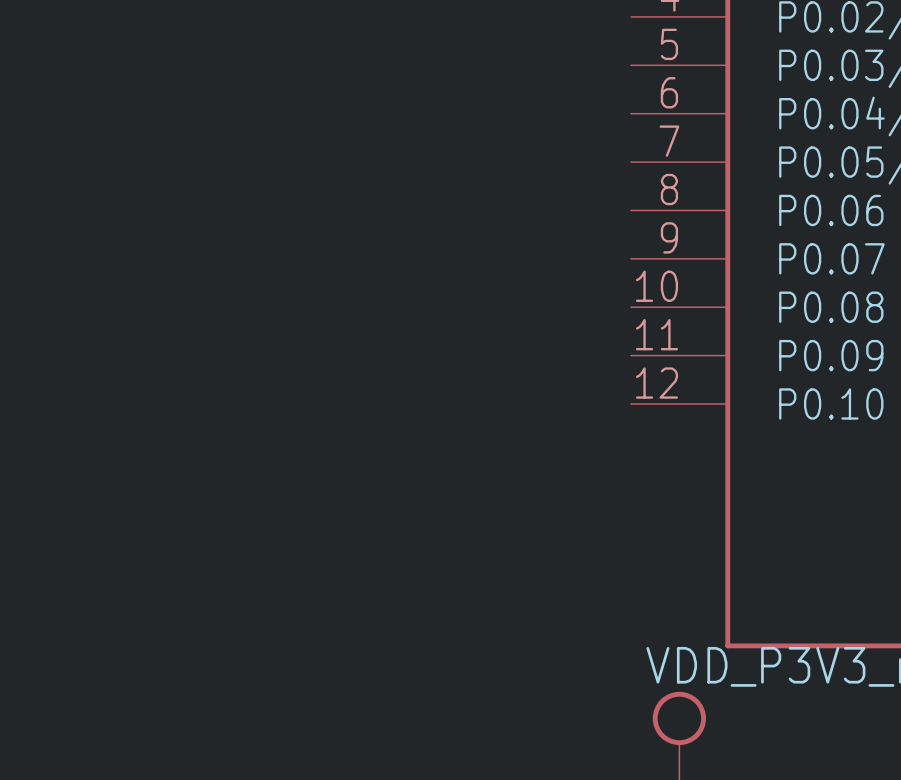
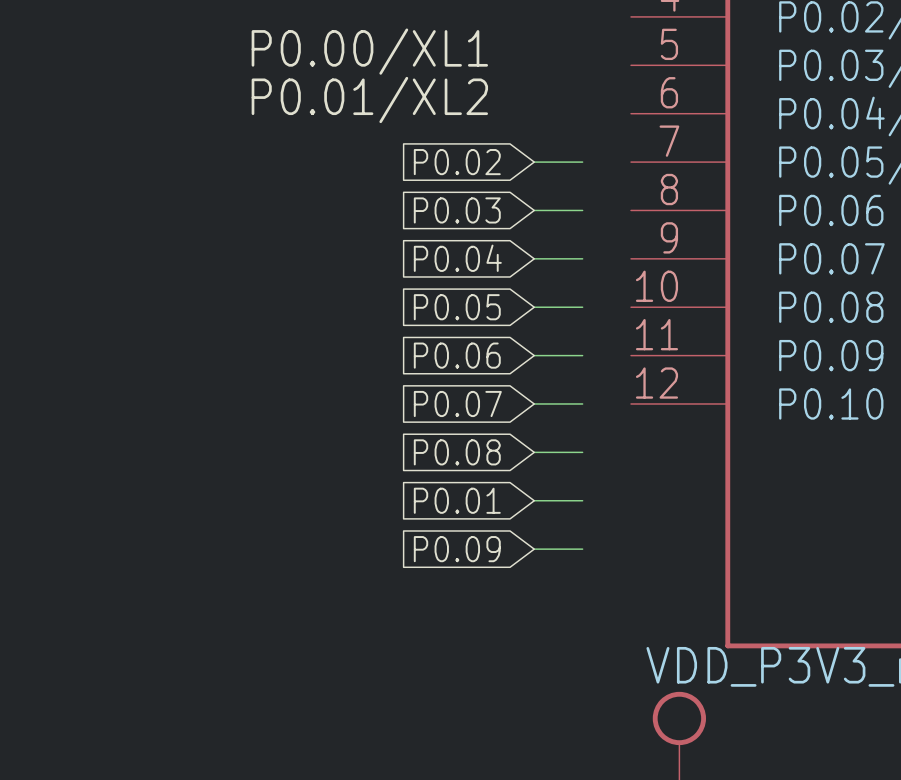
label: none -> P0.00/XL1 (369, 51)
label: none -> P0.01/XL2 (369, 99)
global label: none -> P0.02 (457, 162)
wire: none -> (534, 162) (582, 162)
global label: none -> P0.03 (457, 210)
wire: none -> (534, 210) (582, 210)
global label: none -> P0.04 (457, 258)
wire: none -> (534, 258) (582, 258)
global label: none -> P0.05 (457, 307)
wire: none -> (534, 307) (582, 307)
global label: none -> P0.06 (457, 355)
wire: none -> (534, 355) (582, 355)
global label: none -> P0.07 (457, 403)
wire: none -> (534, 403) (582, 403)
global label: none -> P0.08 (457, 452)
wire: none -> (534, 452) (582, 452)
global label: none -> P0.01 (457, 500)
wire: none -> (534, 500) (582, 500)
global label: none -> P0.09 (457, 549)
wire: none -> (534, 549) (582, 549)

